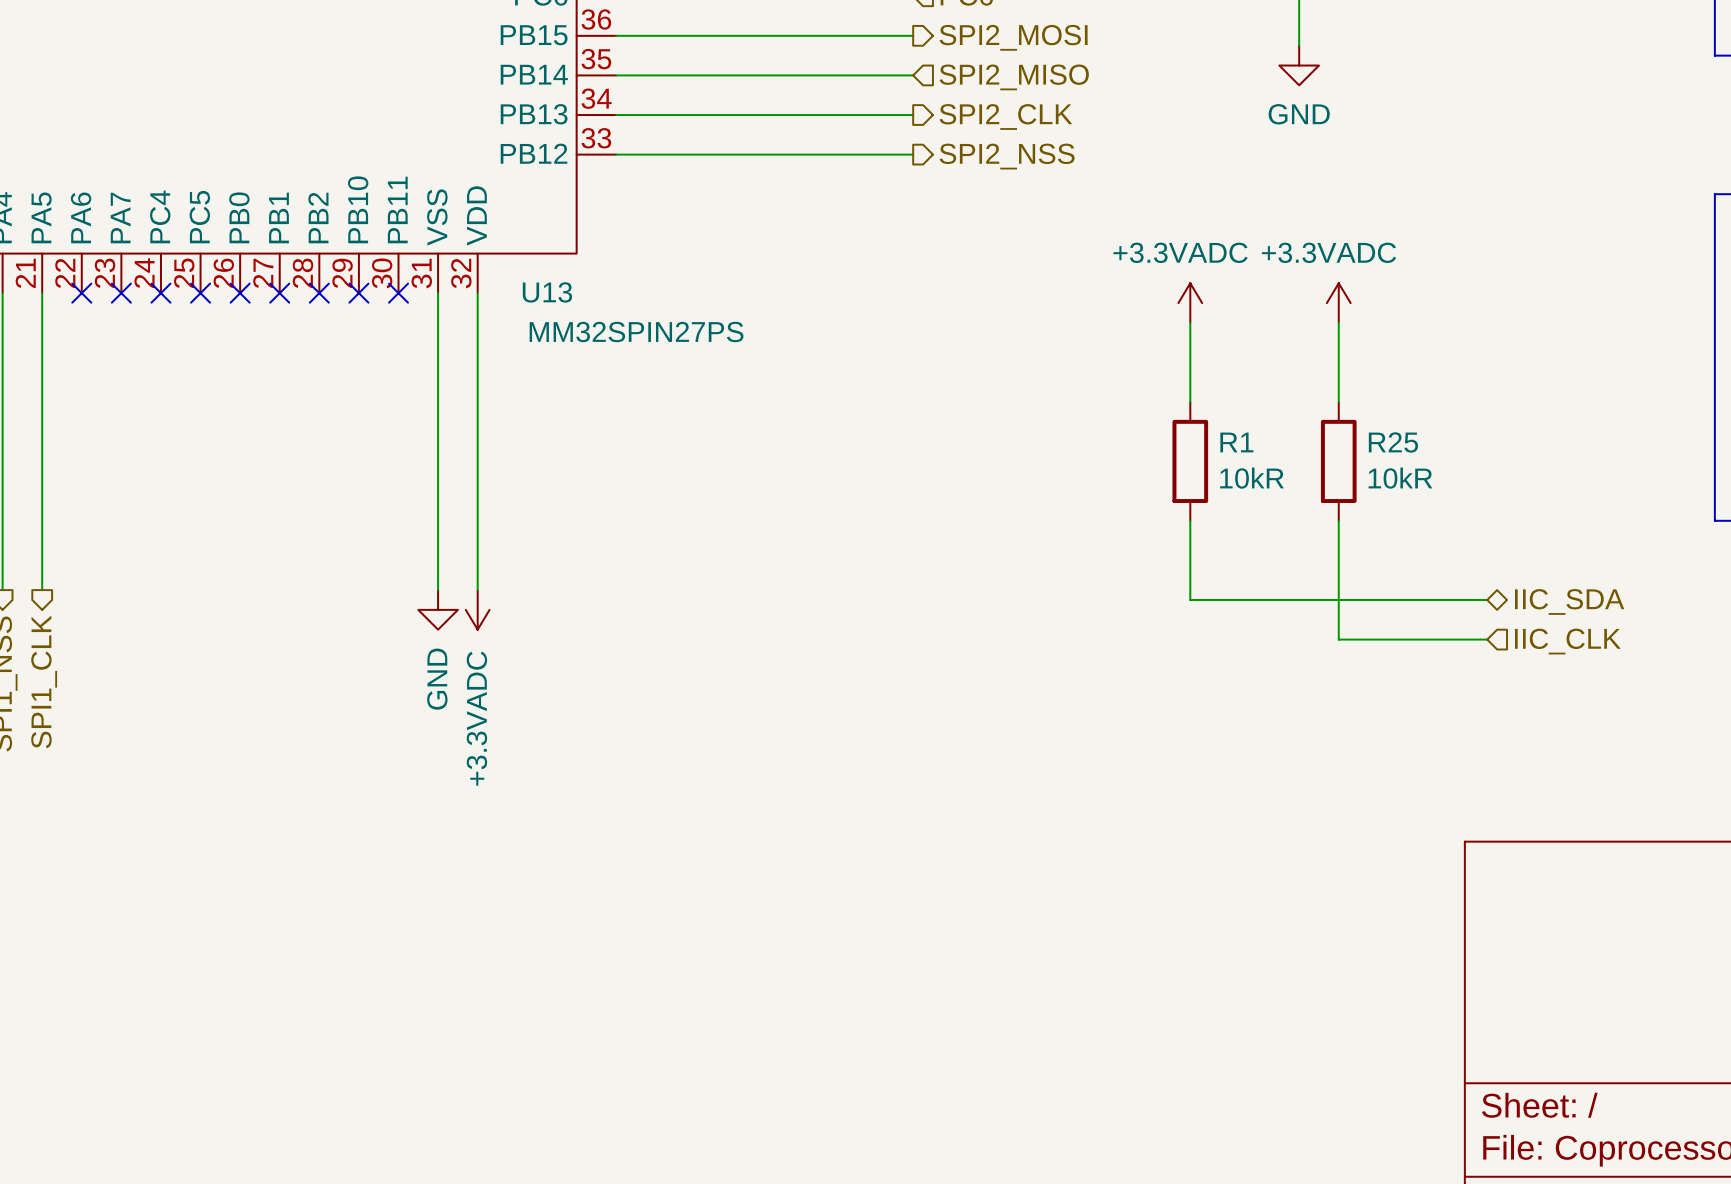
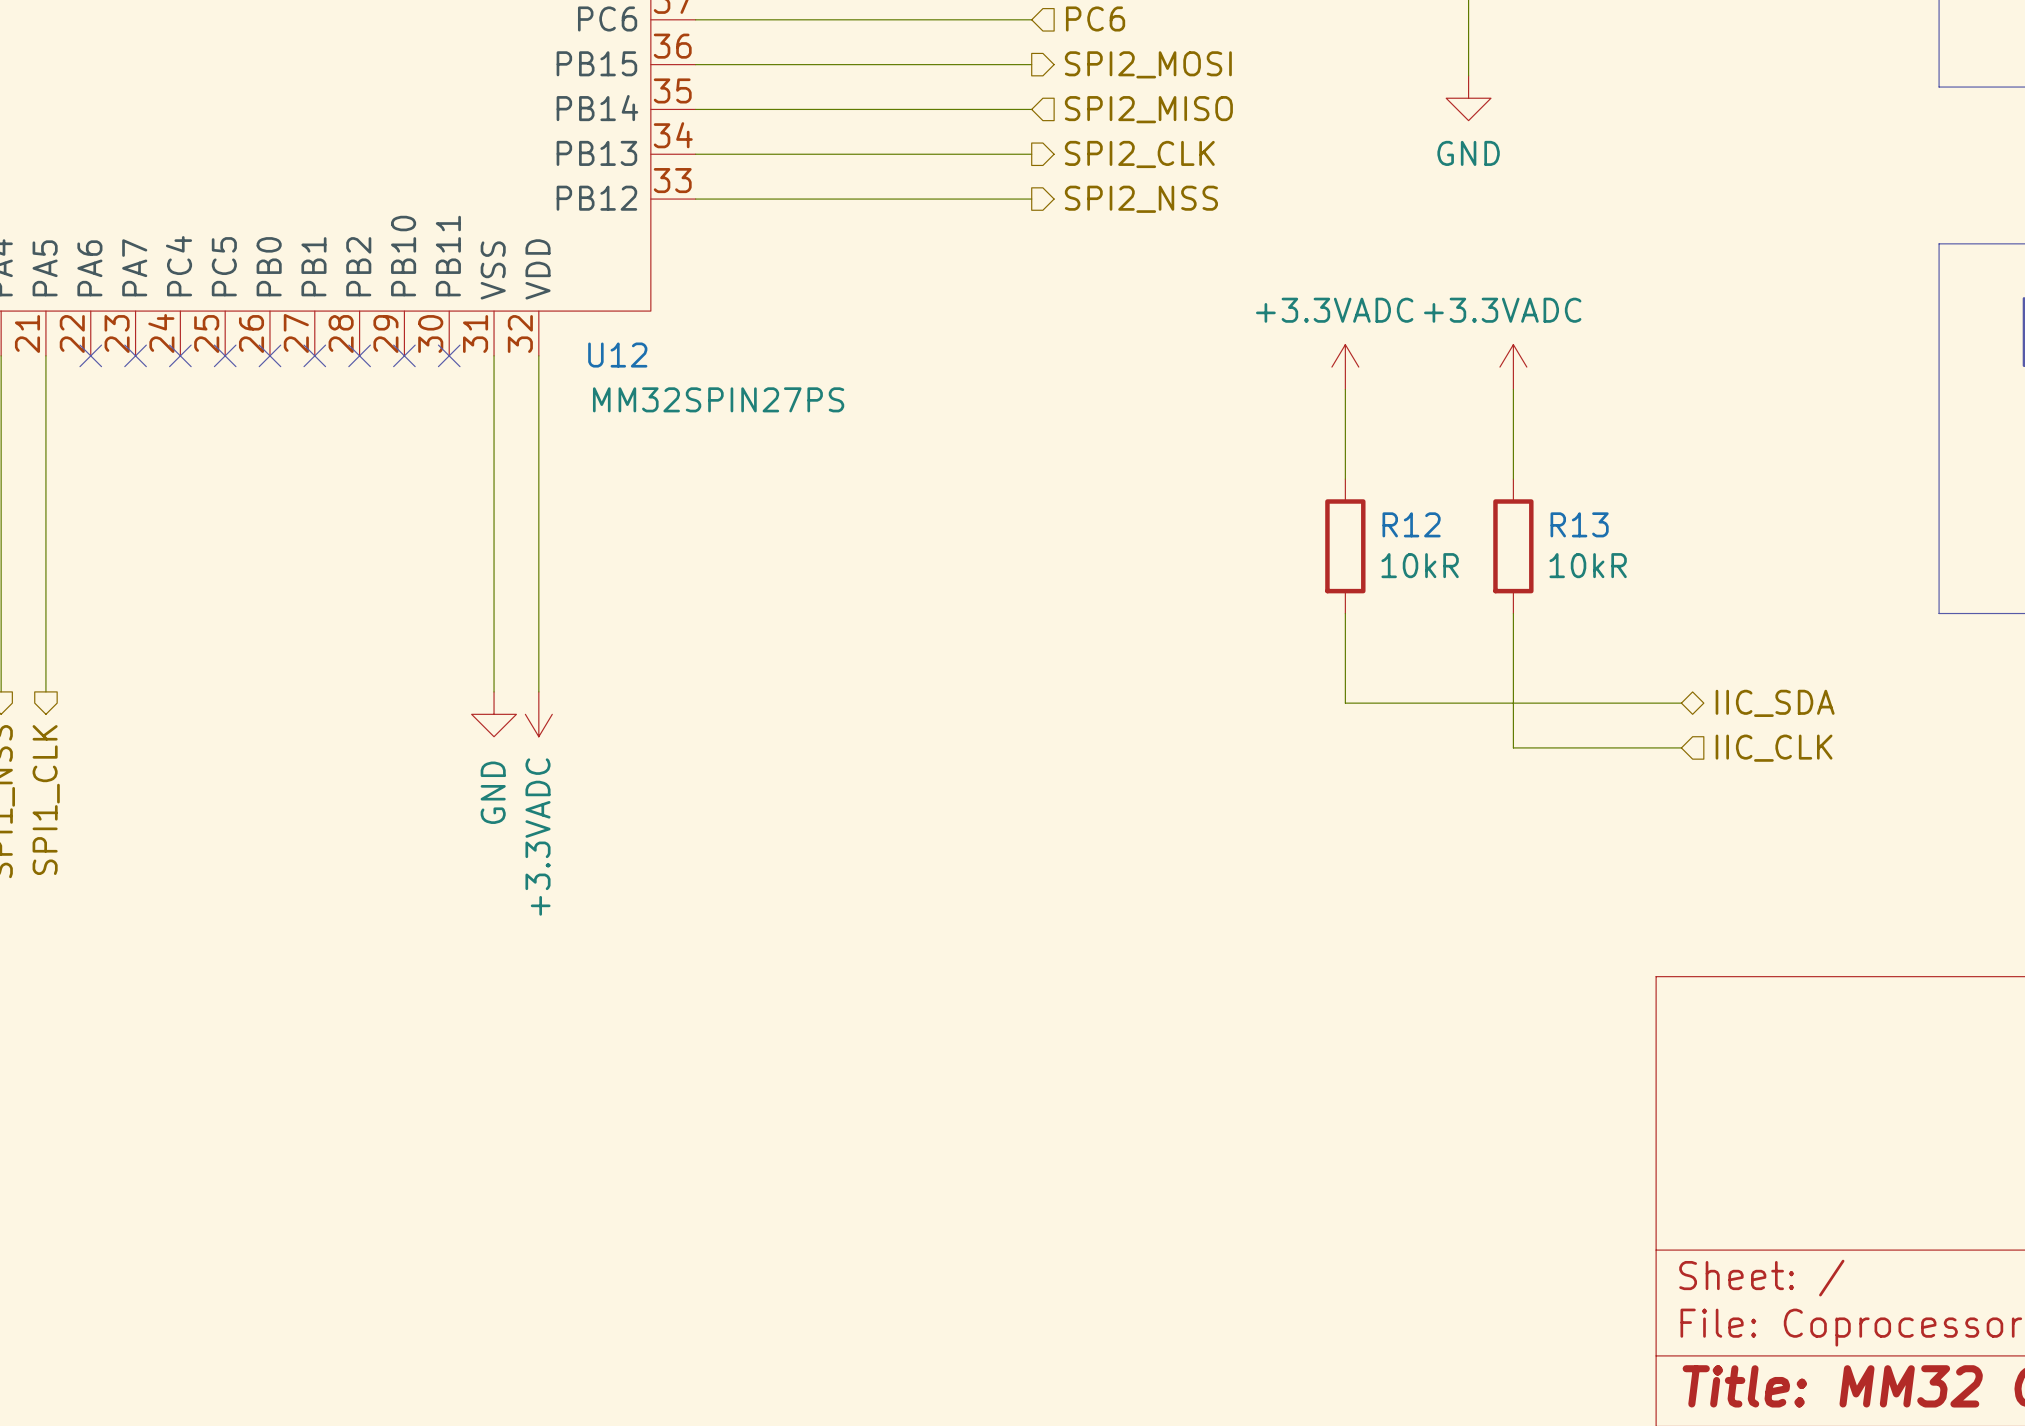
U13 name: U13 (547, 292) -> U12 (617, 355)
R1 name: R1 (1236, 442) -> R12 (1411, 524)
R25 name: R25 (1393, 442) -> R13 (1579, 524)

